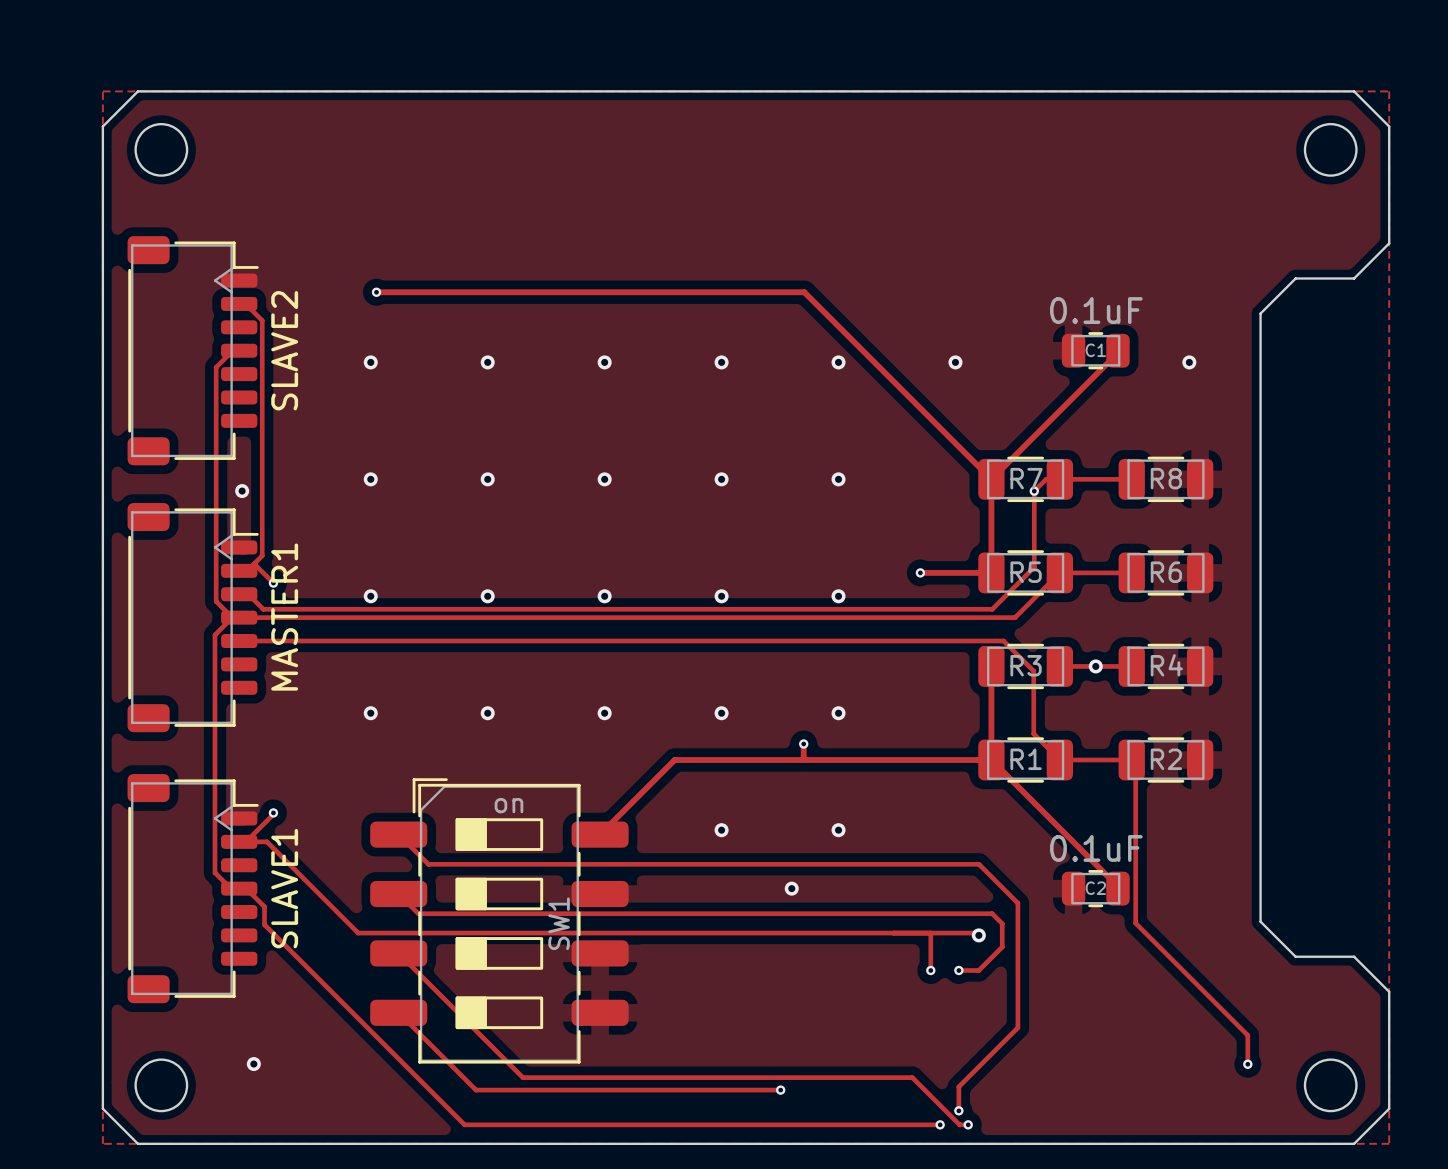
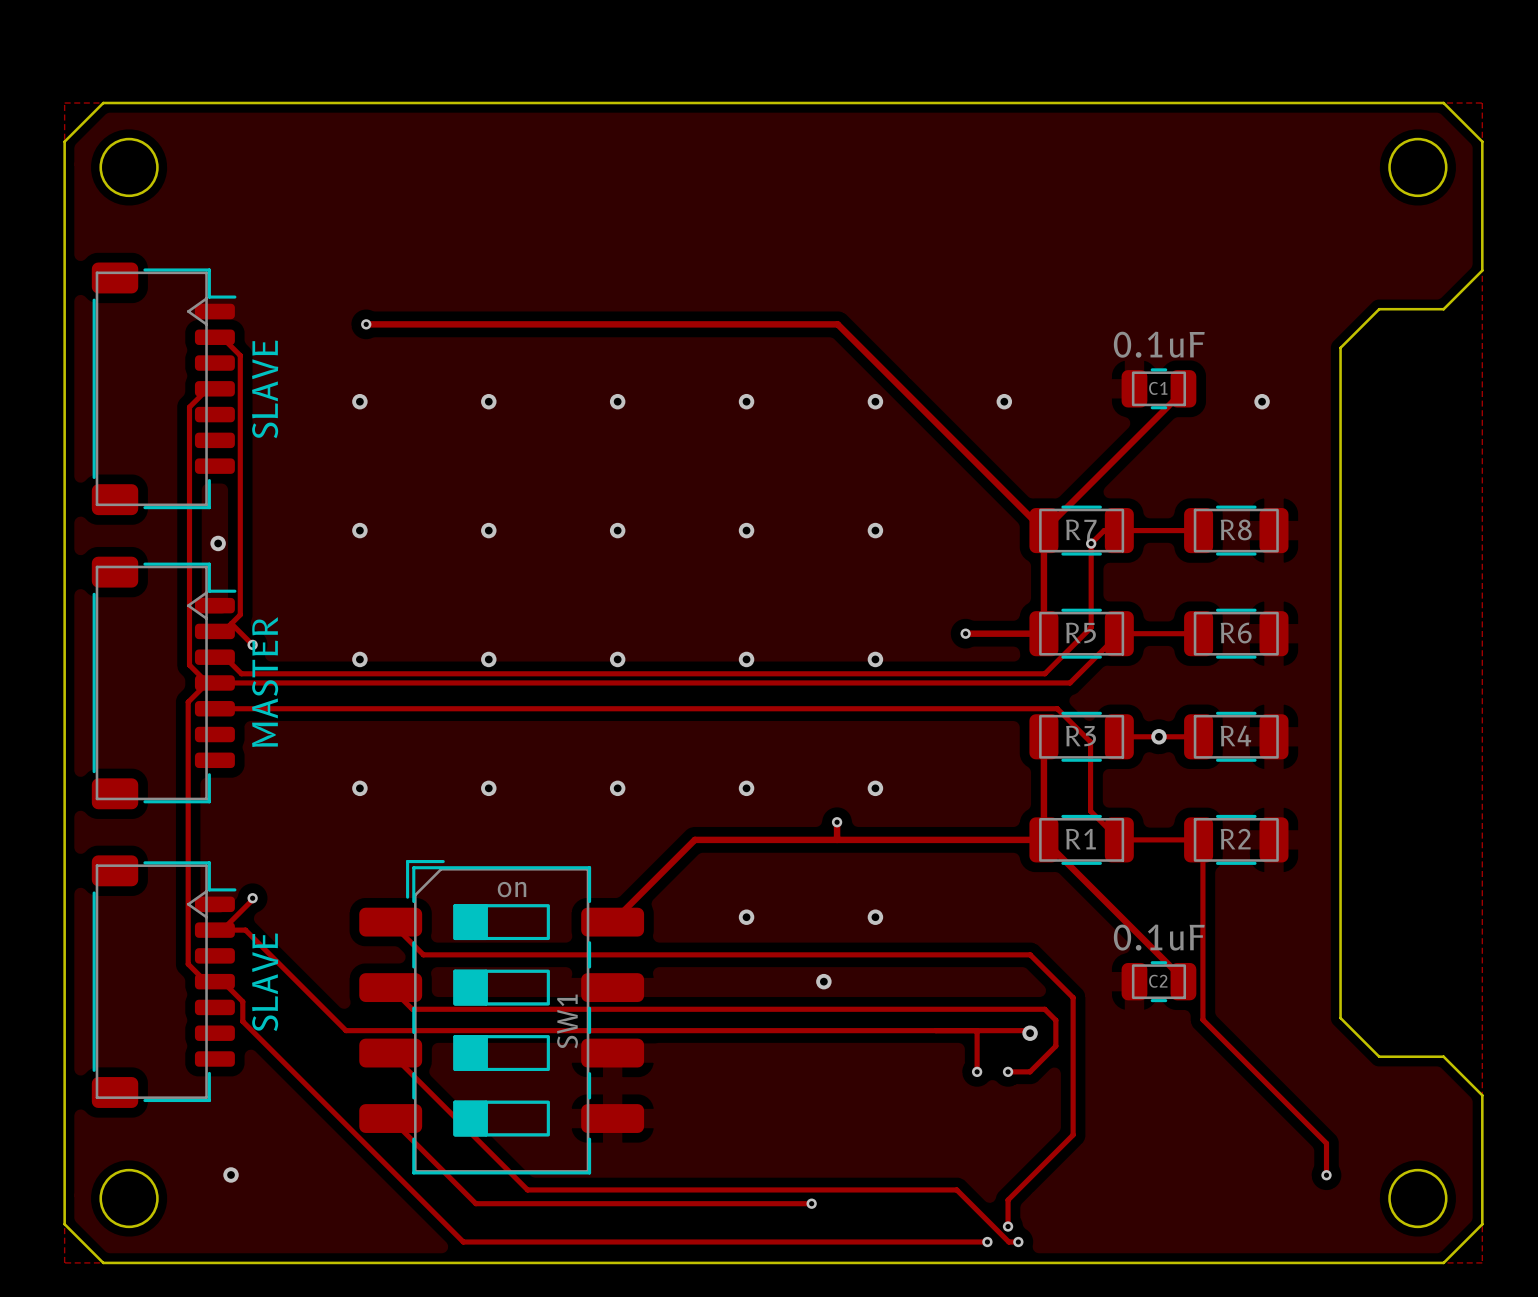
SLAVE2 name: SLAVE2 (284, 350) -> SLAVE (265, 389)
MASTER1 name: MASTER1 (284, 617) -> MASTER (265, 682)
SLAVE1 name: SLAVE1 (284, 888) -> SLAVE (265, 982)

